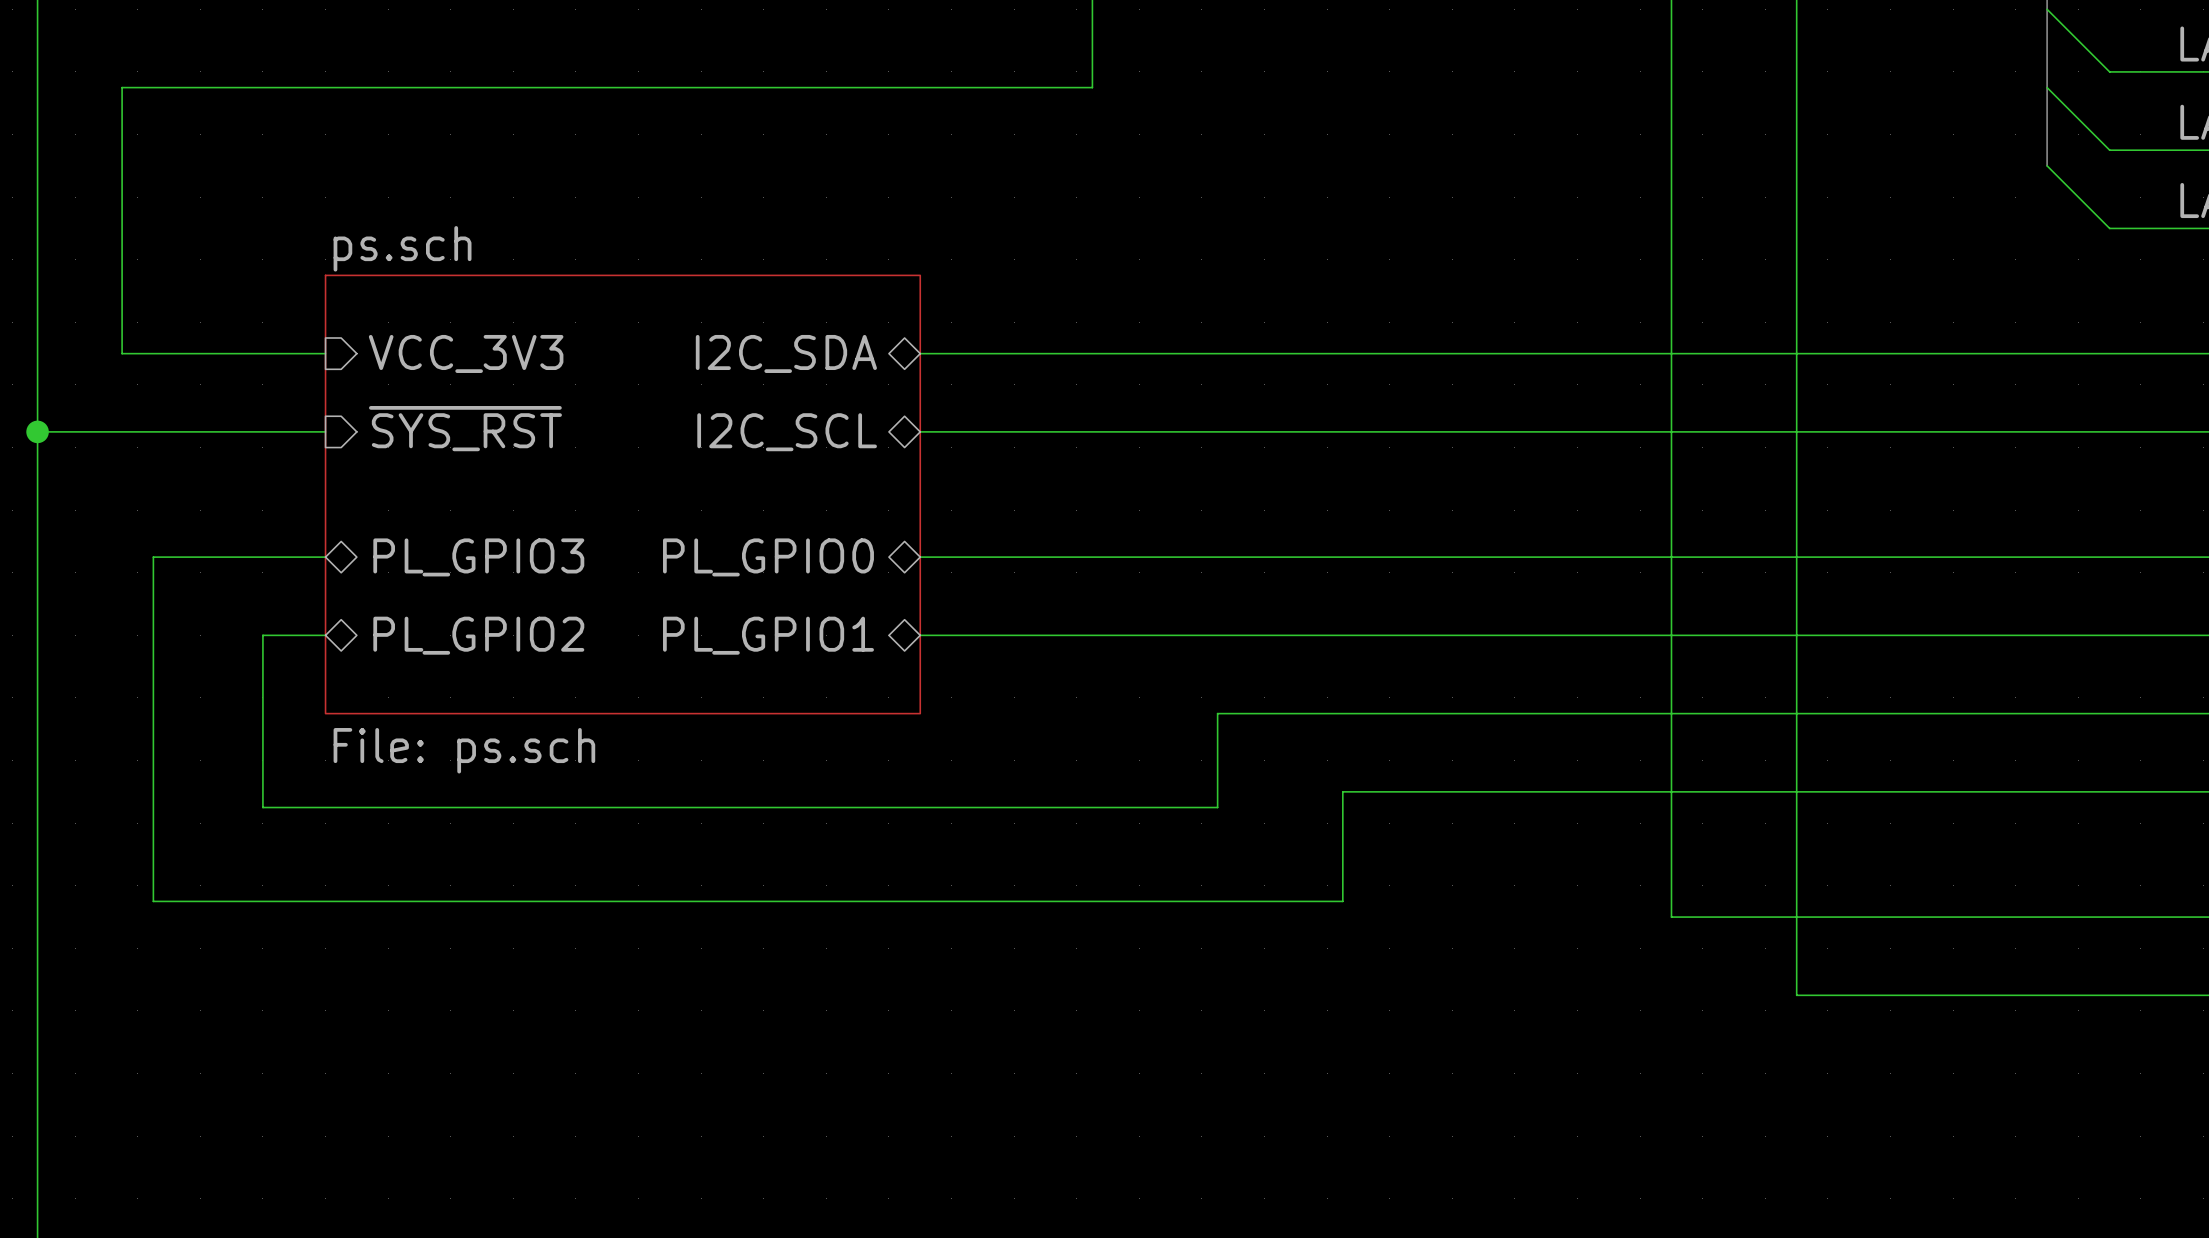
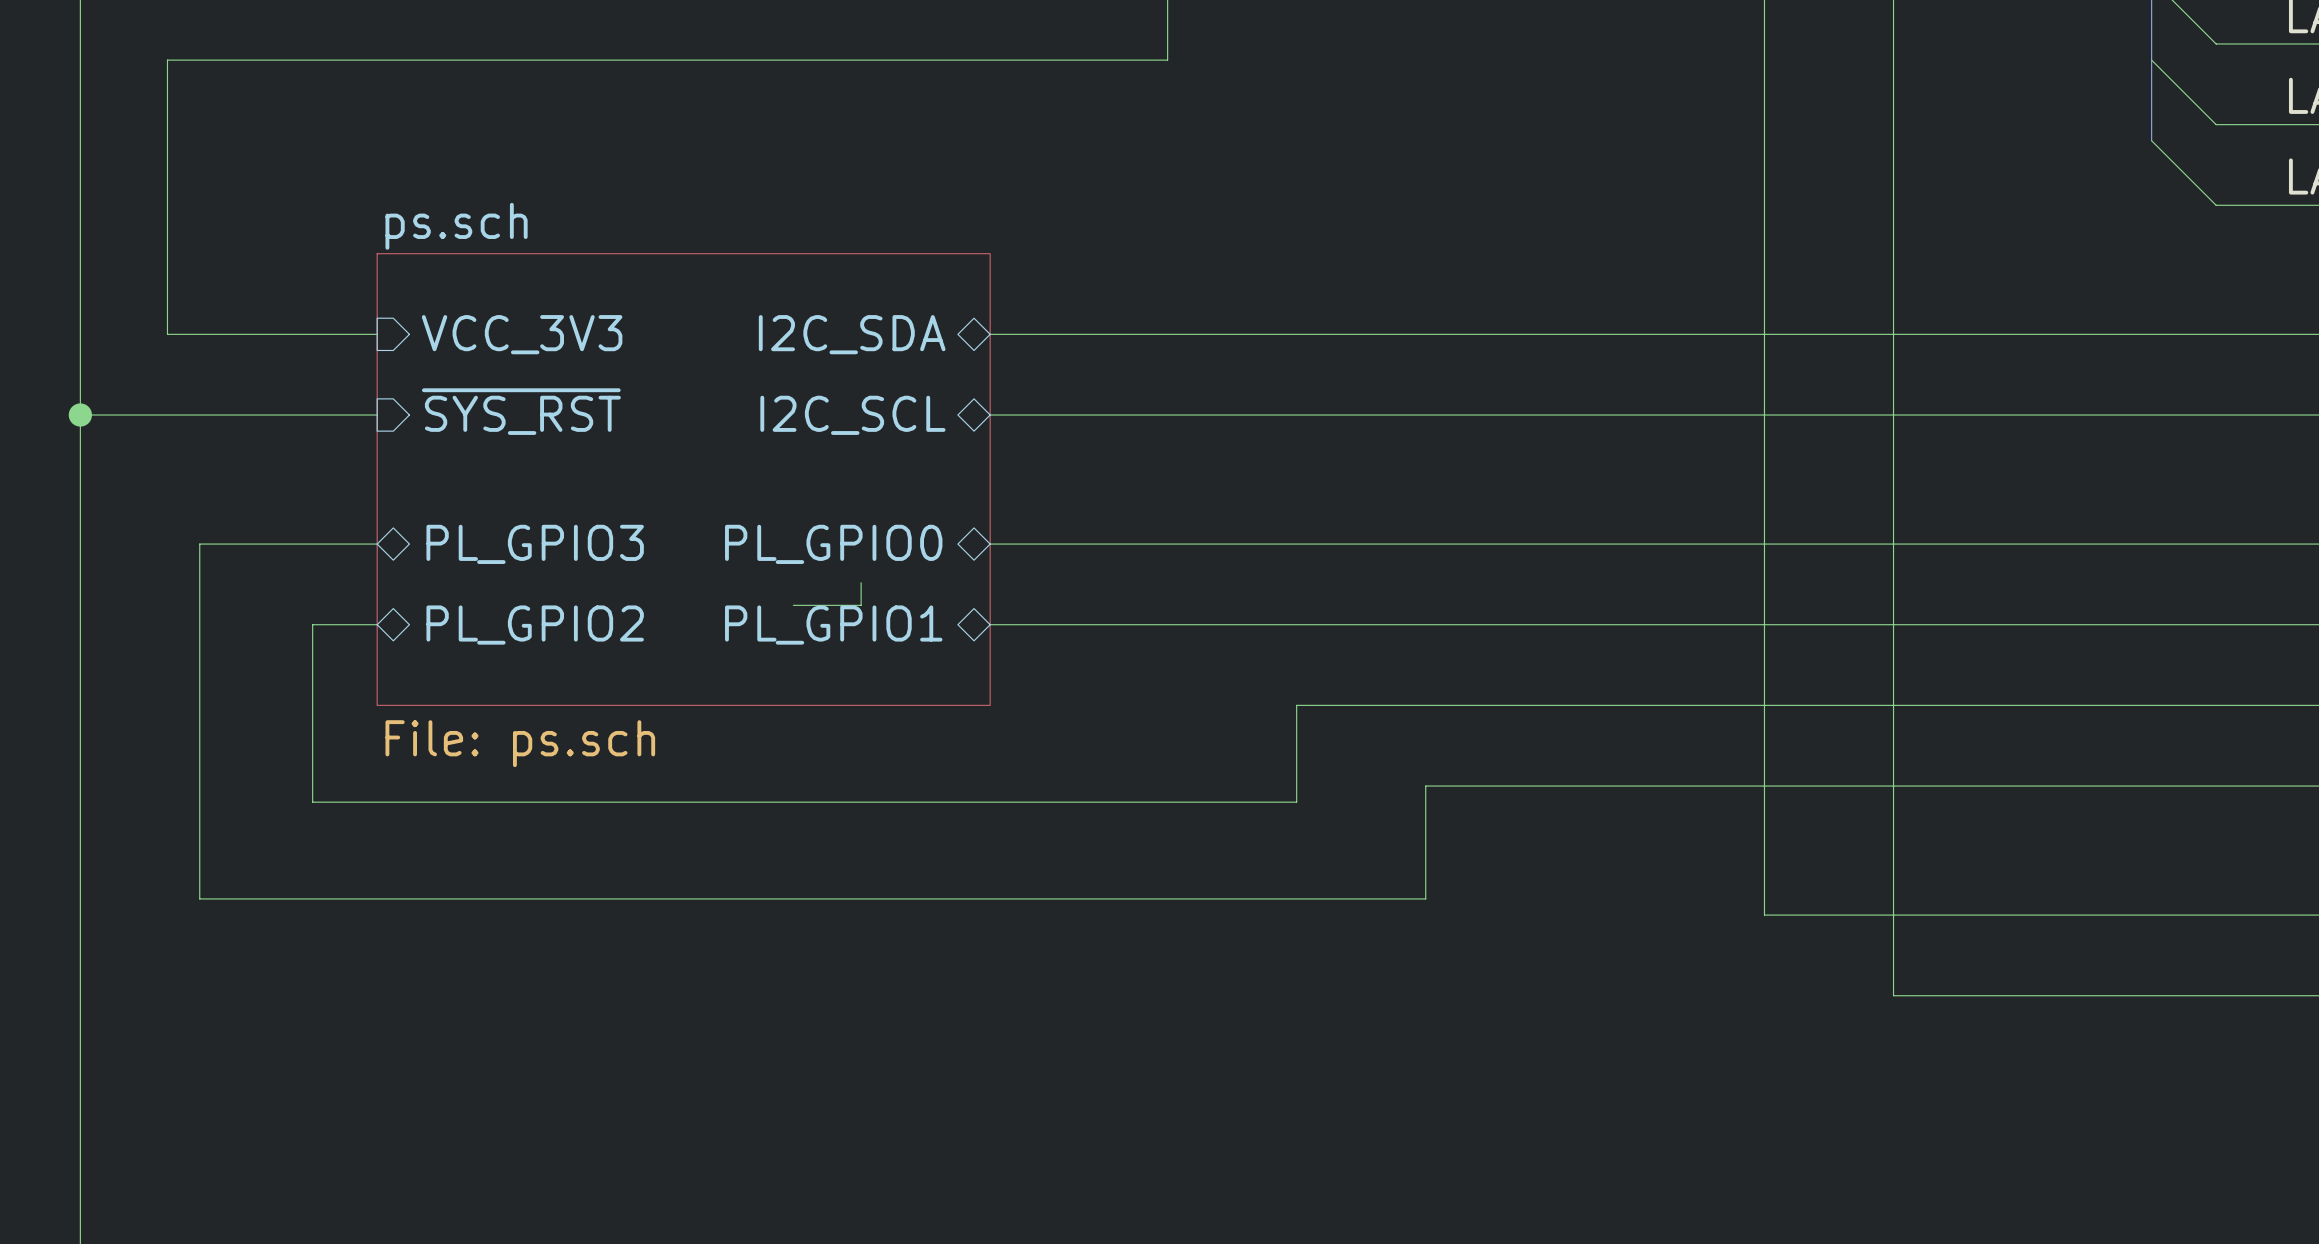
wire: none -> (861, 582) (861, 605) (793, 605)

